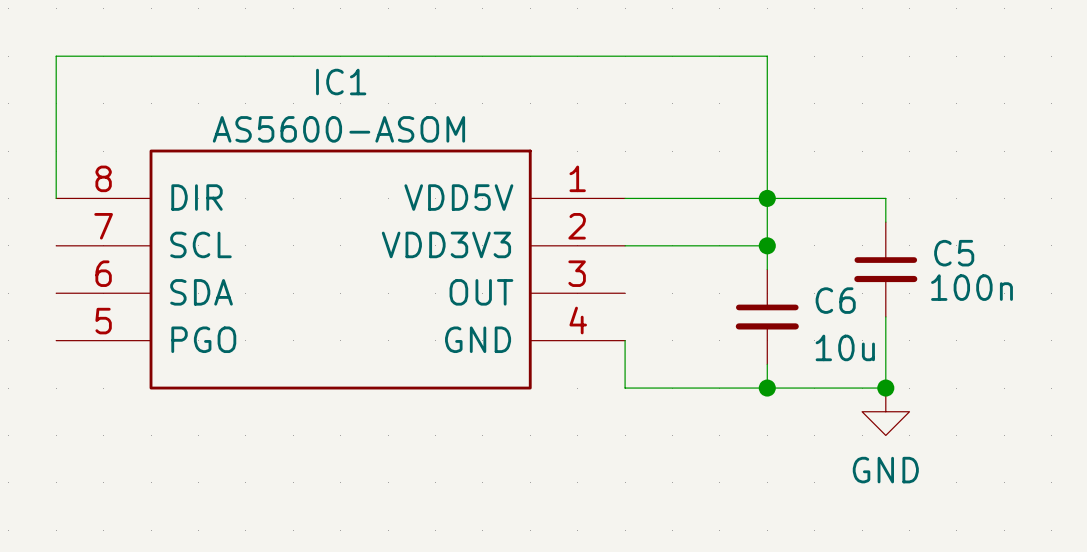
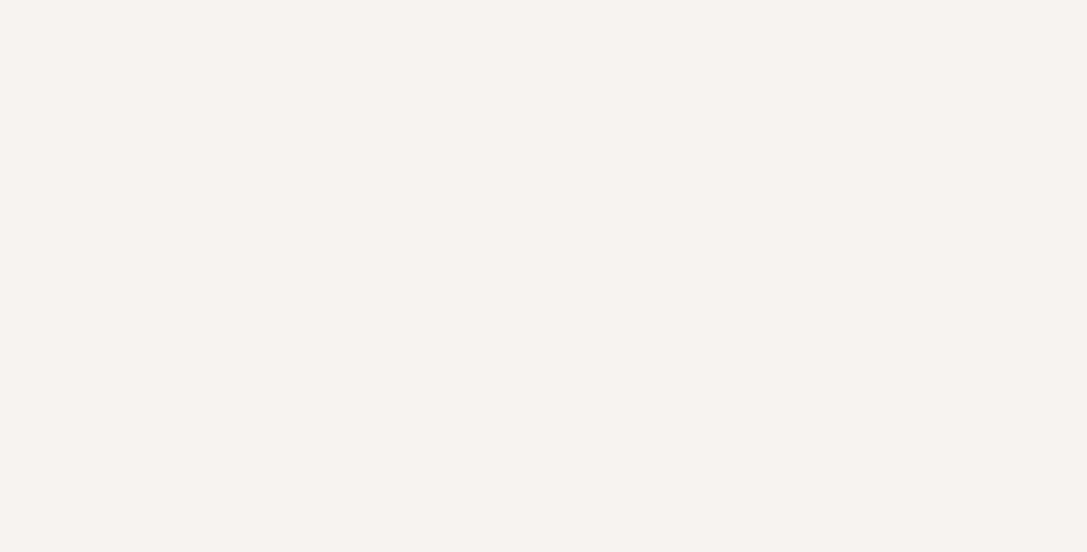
wire: (56, 198) (56, 56) (767, 56) (767, 269) -> none
wire: (625, 198) (885, 198) (885, 222) -> none
junction: (767, 198) -> none
wire: (625, 245) (767, 245) -> none
junction: (767, 245) -> none
IC1: AS5600-ASOM (340, 269) -> none
C5: 100n (885, 269) -> none
C6: 10u (767, 316) -> none
wire: (885, 316) (885, 388) (625, 388) (625, 340) -> none
wire: (767, 364) (767, 388) -> none
junction: (767, 388) -> none
junction: (885, 388) -> none
power symbol: GND (885, 411) -> none

